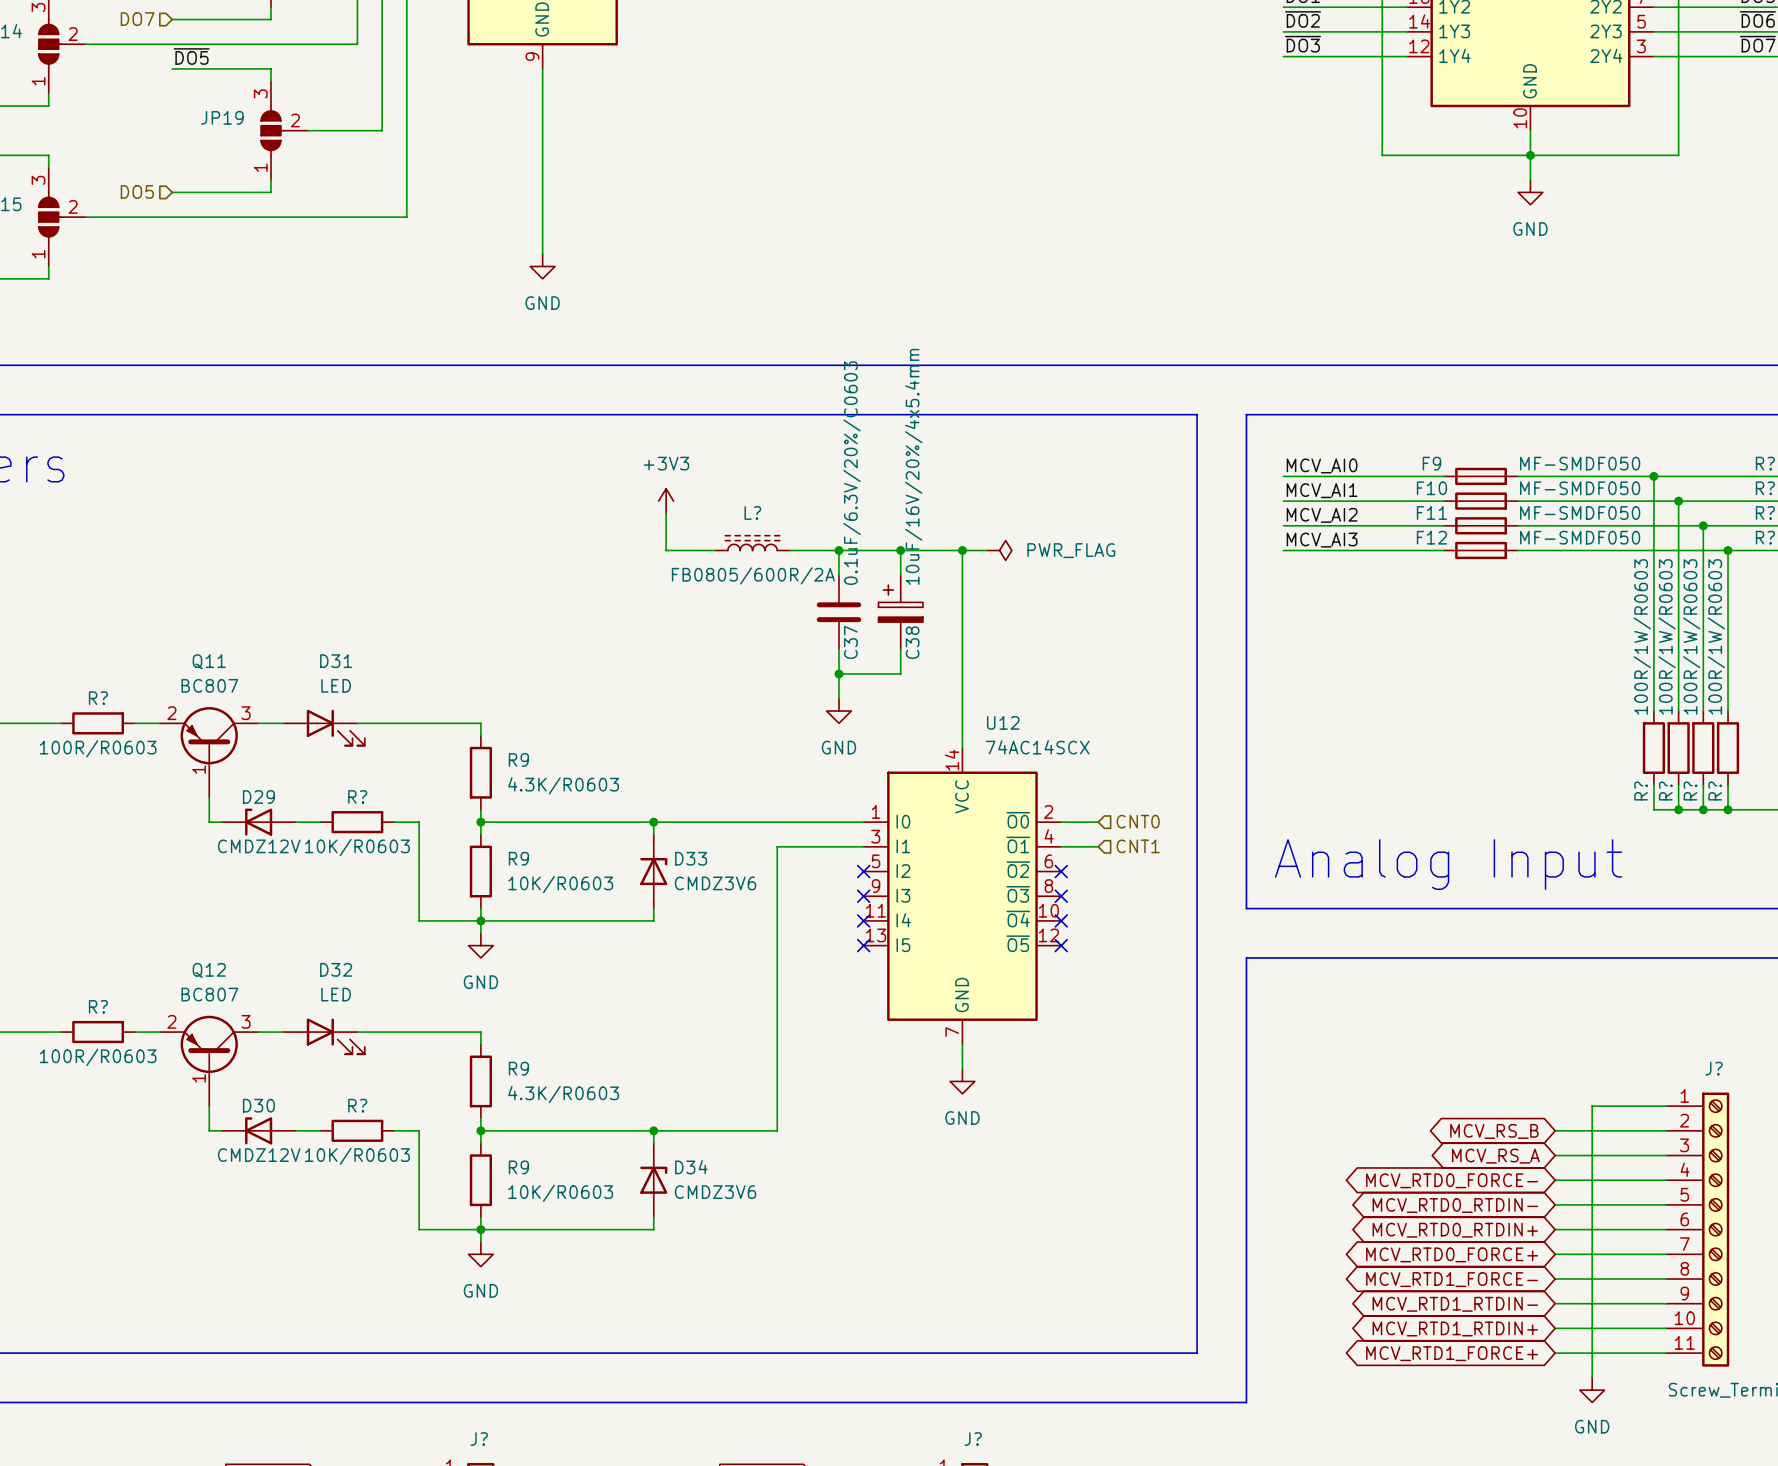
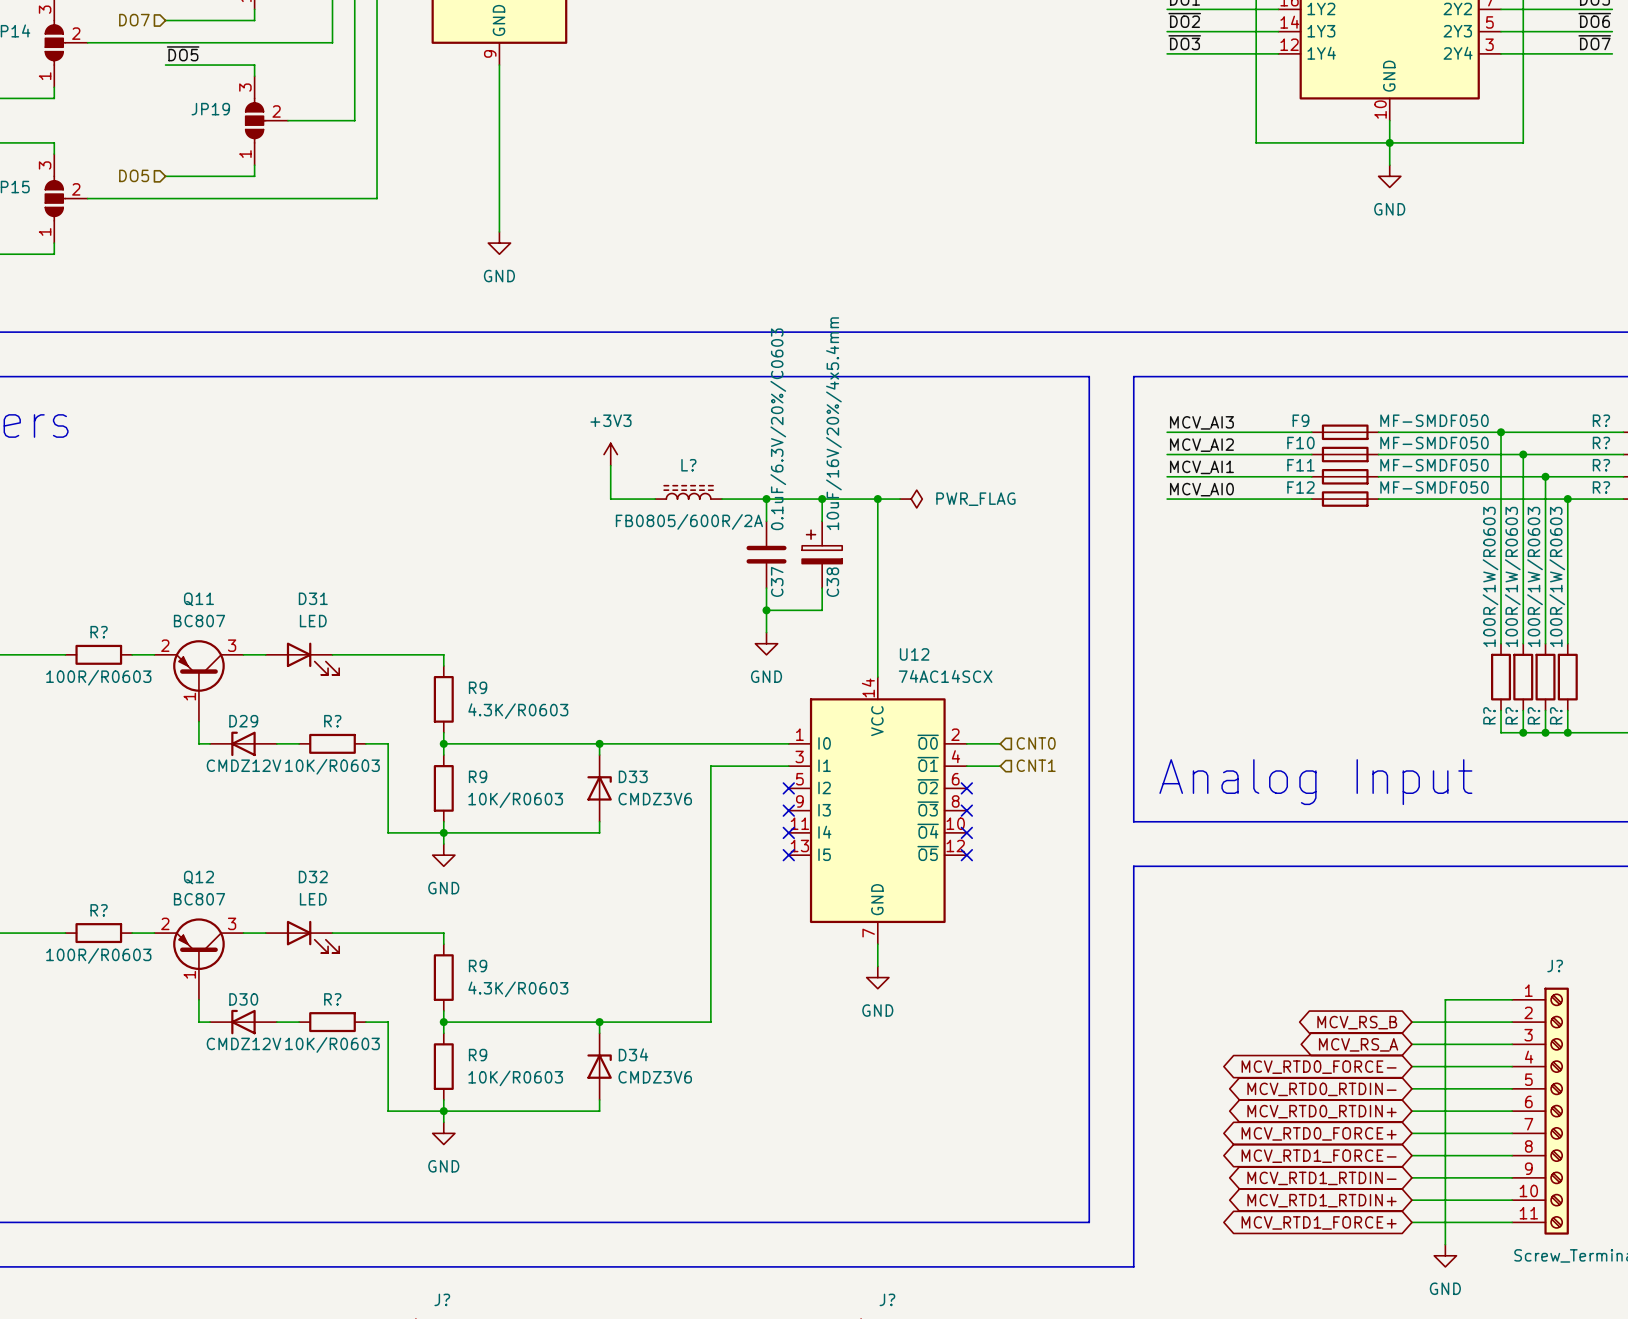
label: MCV_AI0 (1322, 465) -> MCV_AI3 (1201, 422)
label: MCV_AI1 (1322, 490) -> MCV_AI2 (1201, 445)
label: MCV_AI2 (1322, 515) -> MCV_AI1 (1201, 467)
label: MCV_AI3 (1322, 540) -> MCV_AI0 (1201, 489)

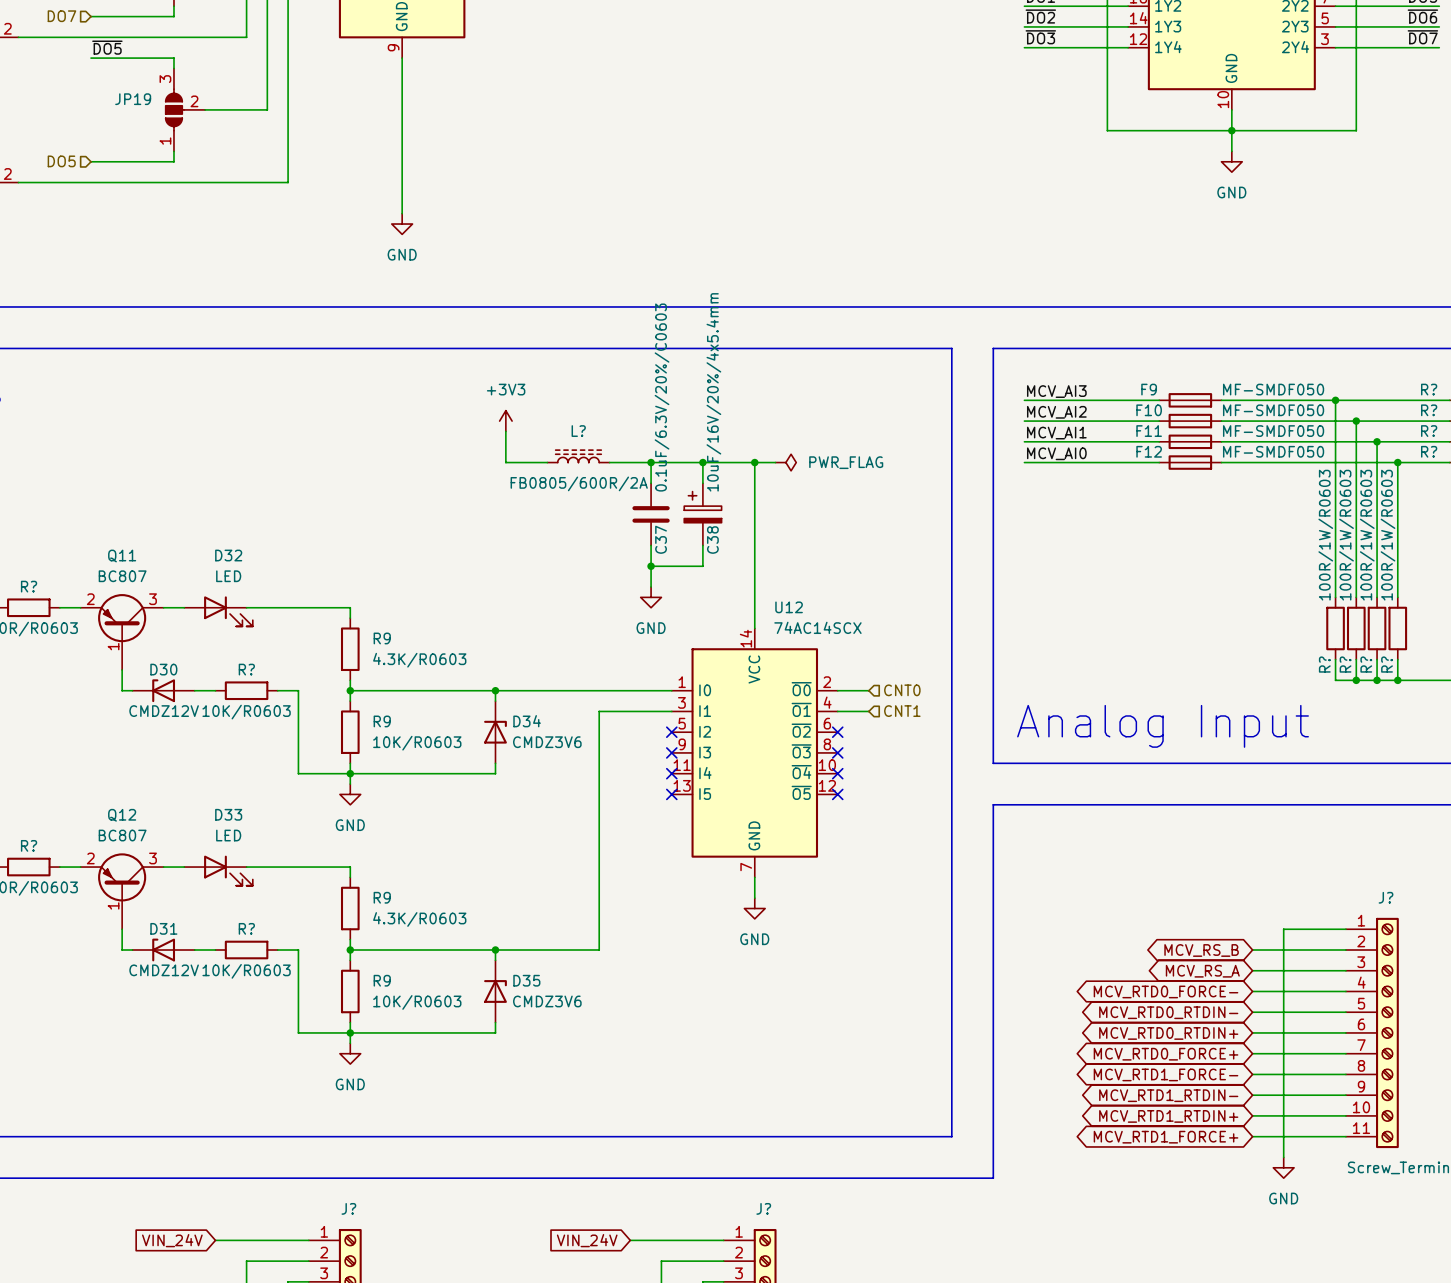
D31 name: D31 (313, 598) -> D32 (228, 555)
D29 name: D29 (243, 721) -> D30 (163, 669)
D33 name: D33 (633, 776) -> D34 (527, 721)
D32 name: D32 (313, 877) -> D33 (228, 814)
D30 name: D30 (243, 999) -> D31 (163, 928)
D34 name: D34 (633, 1054) -> D35 (526, 980)

